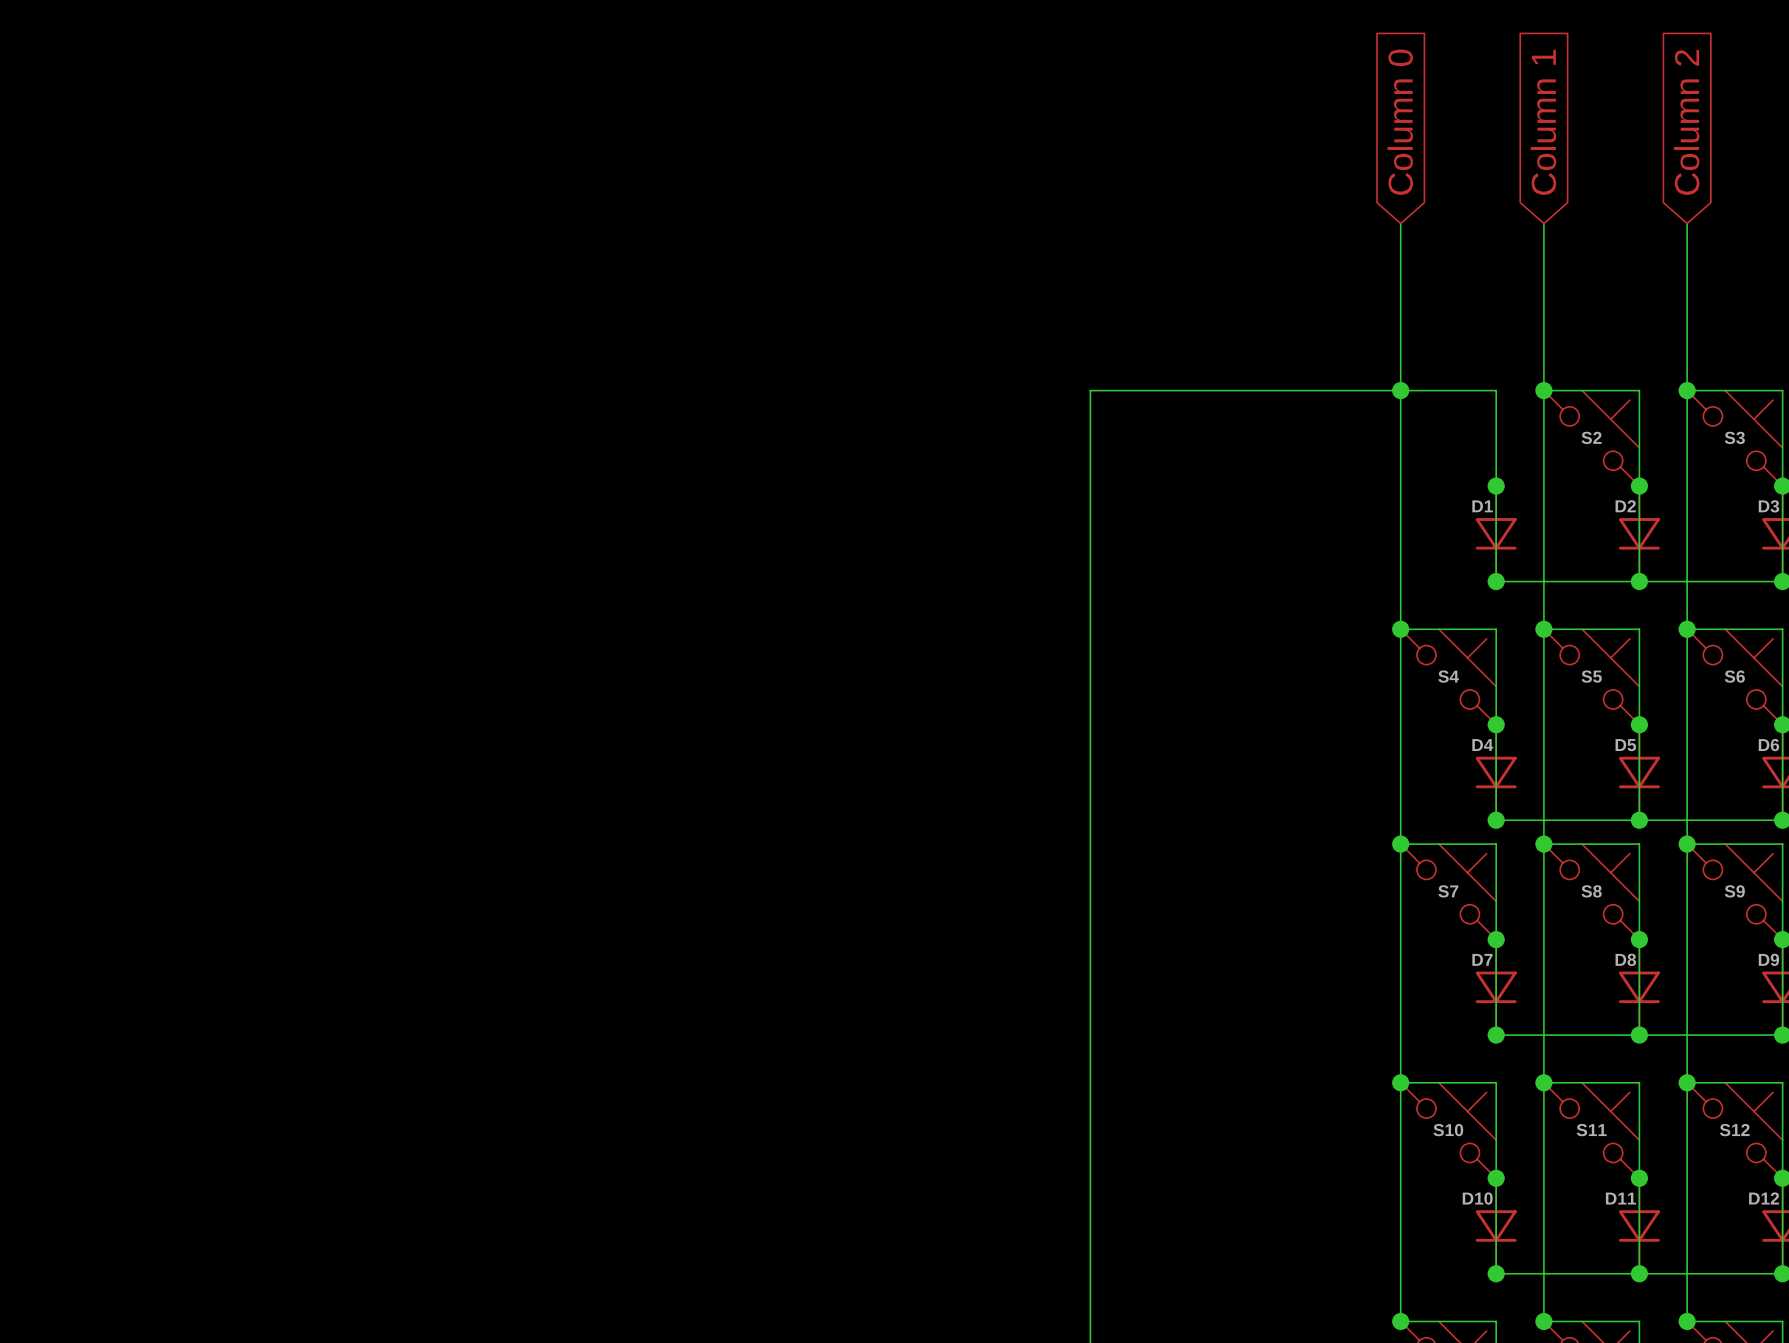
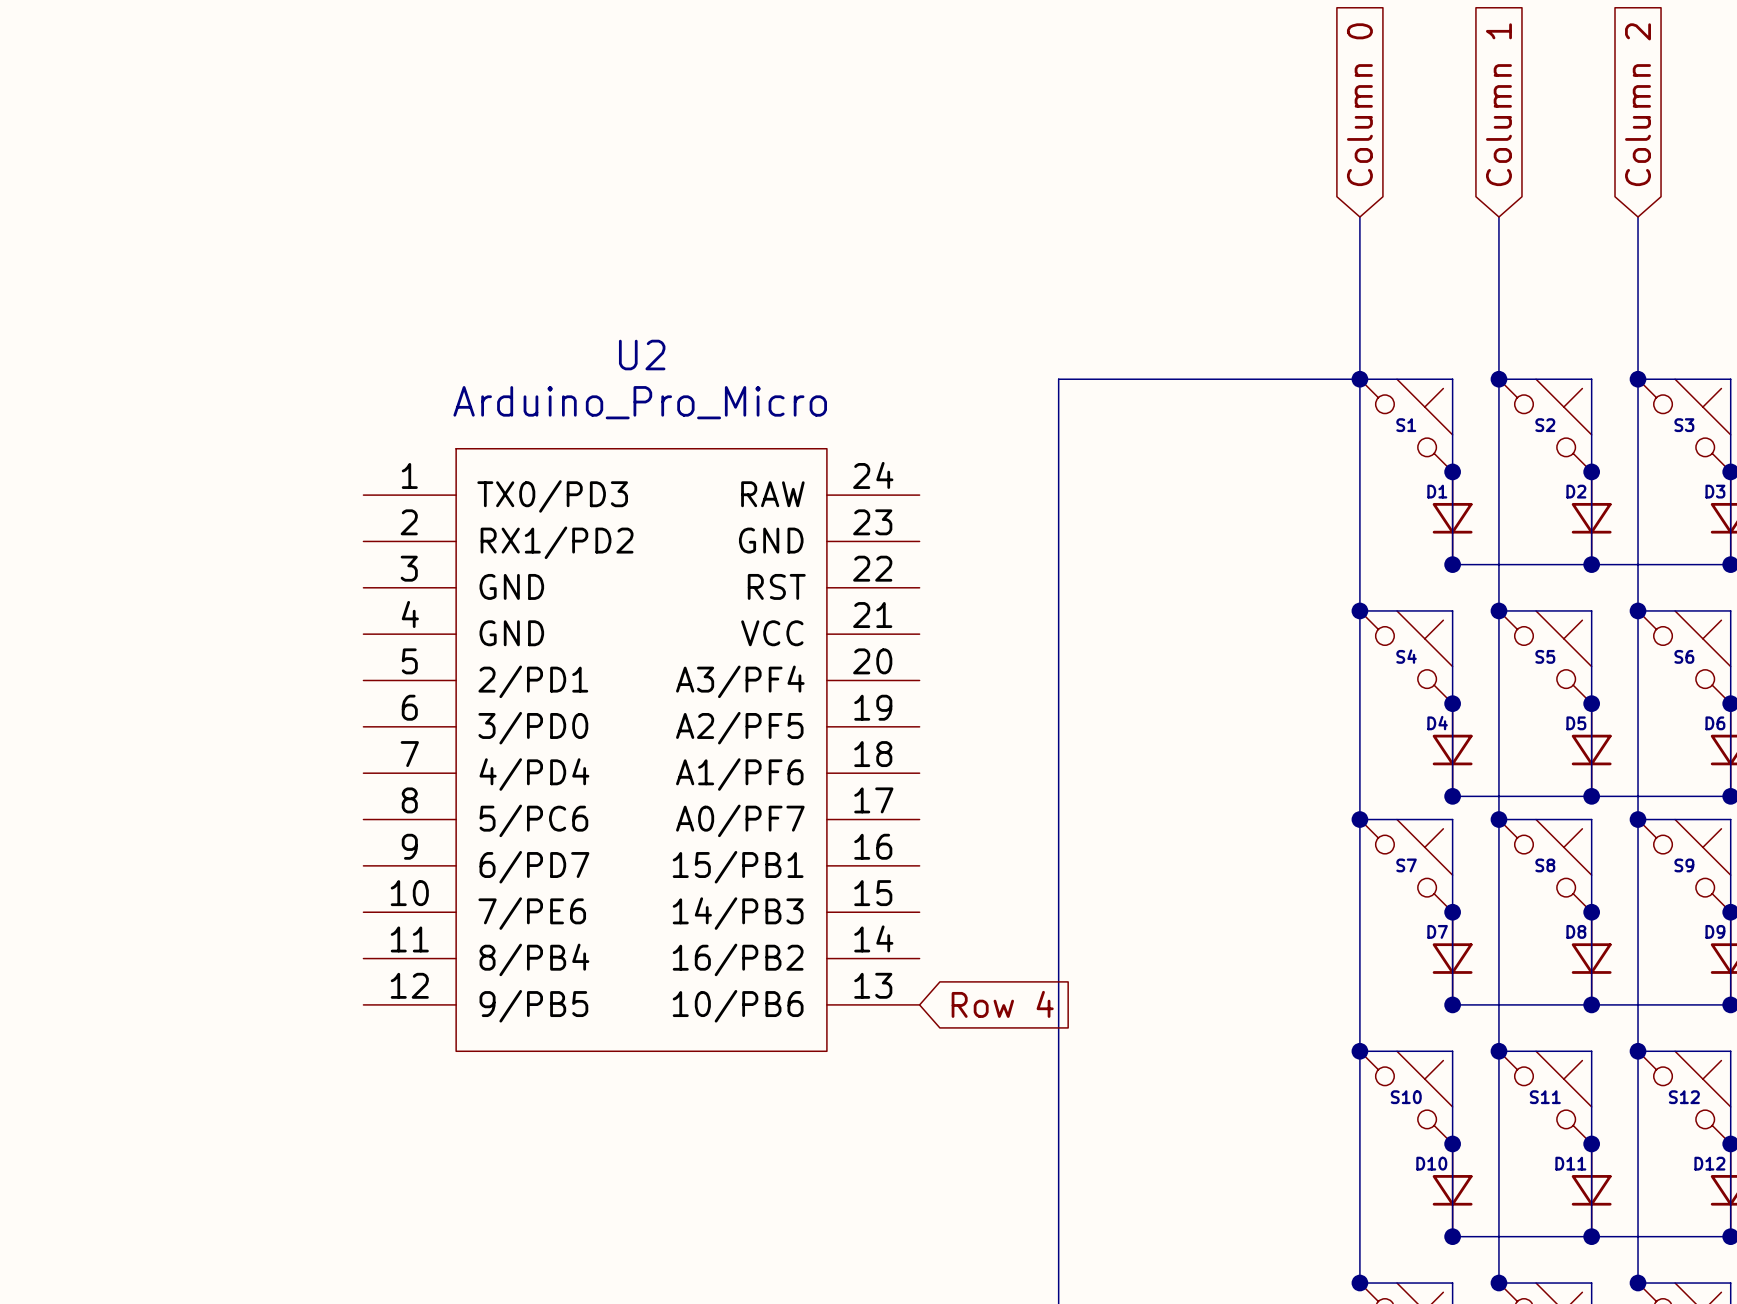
S1: none -> (1406, 425)
U2: none -> Arduino_Pro_Micro (641, 750)
global label: none -> Row 4 (1002, 1004)

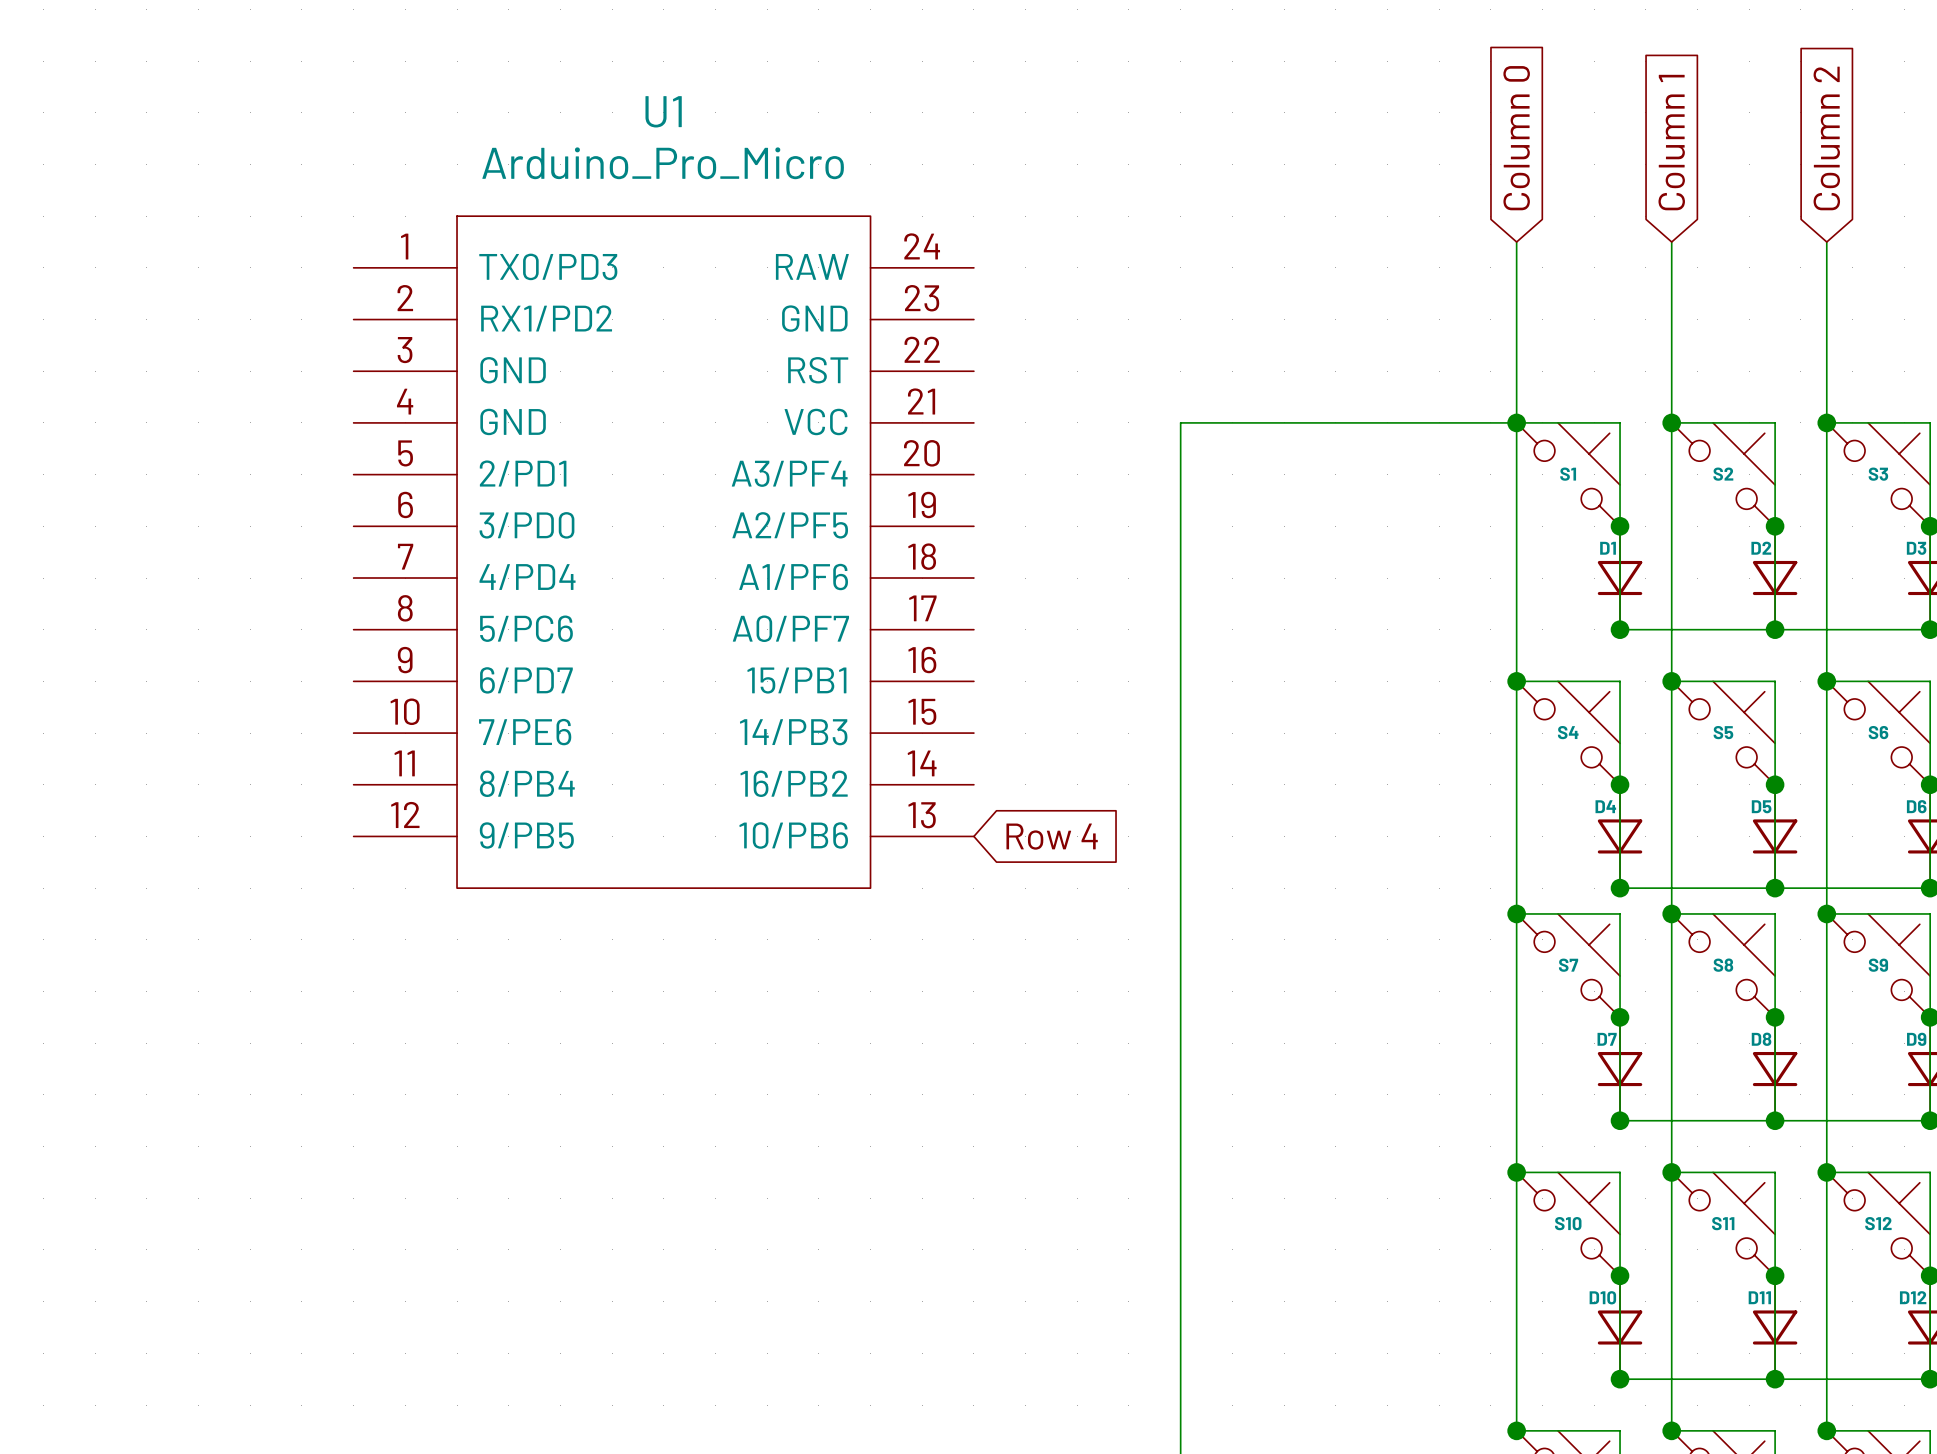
U1: none -> Arduino_Pro_Micro (663, 552)
U2: Arduino_Pro_Micro (641, 750) -> none
global label position: Row 4 (1002, 1004) -> Row 4 (1052, 836)

